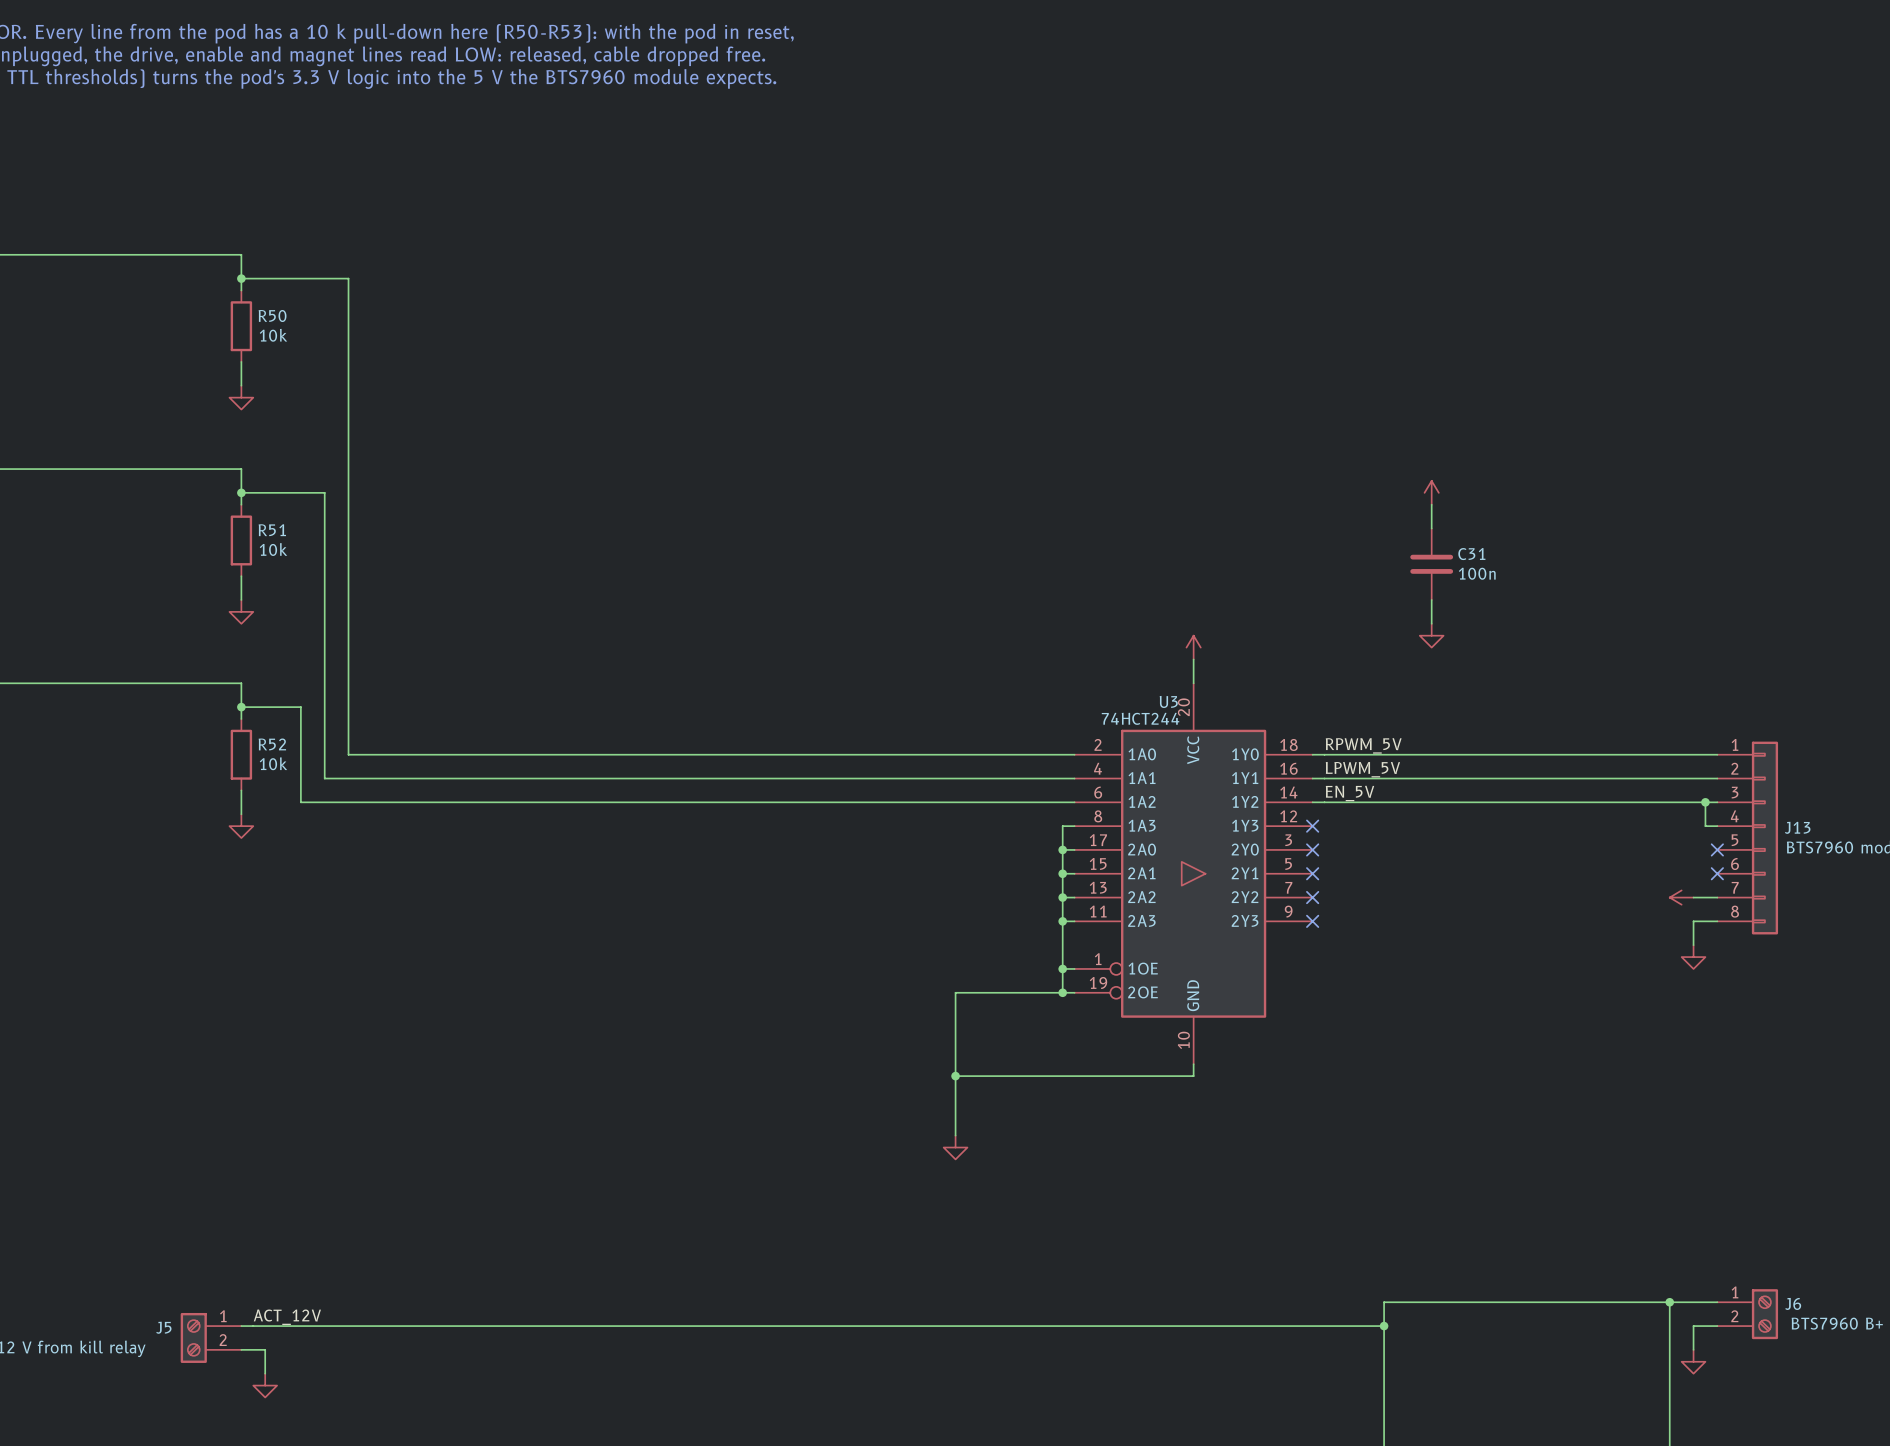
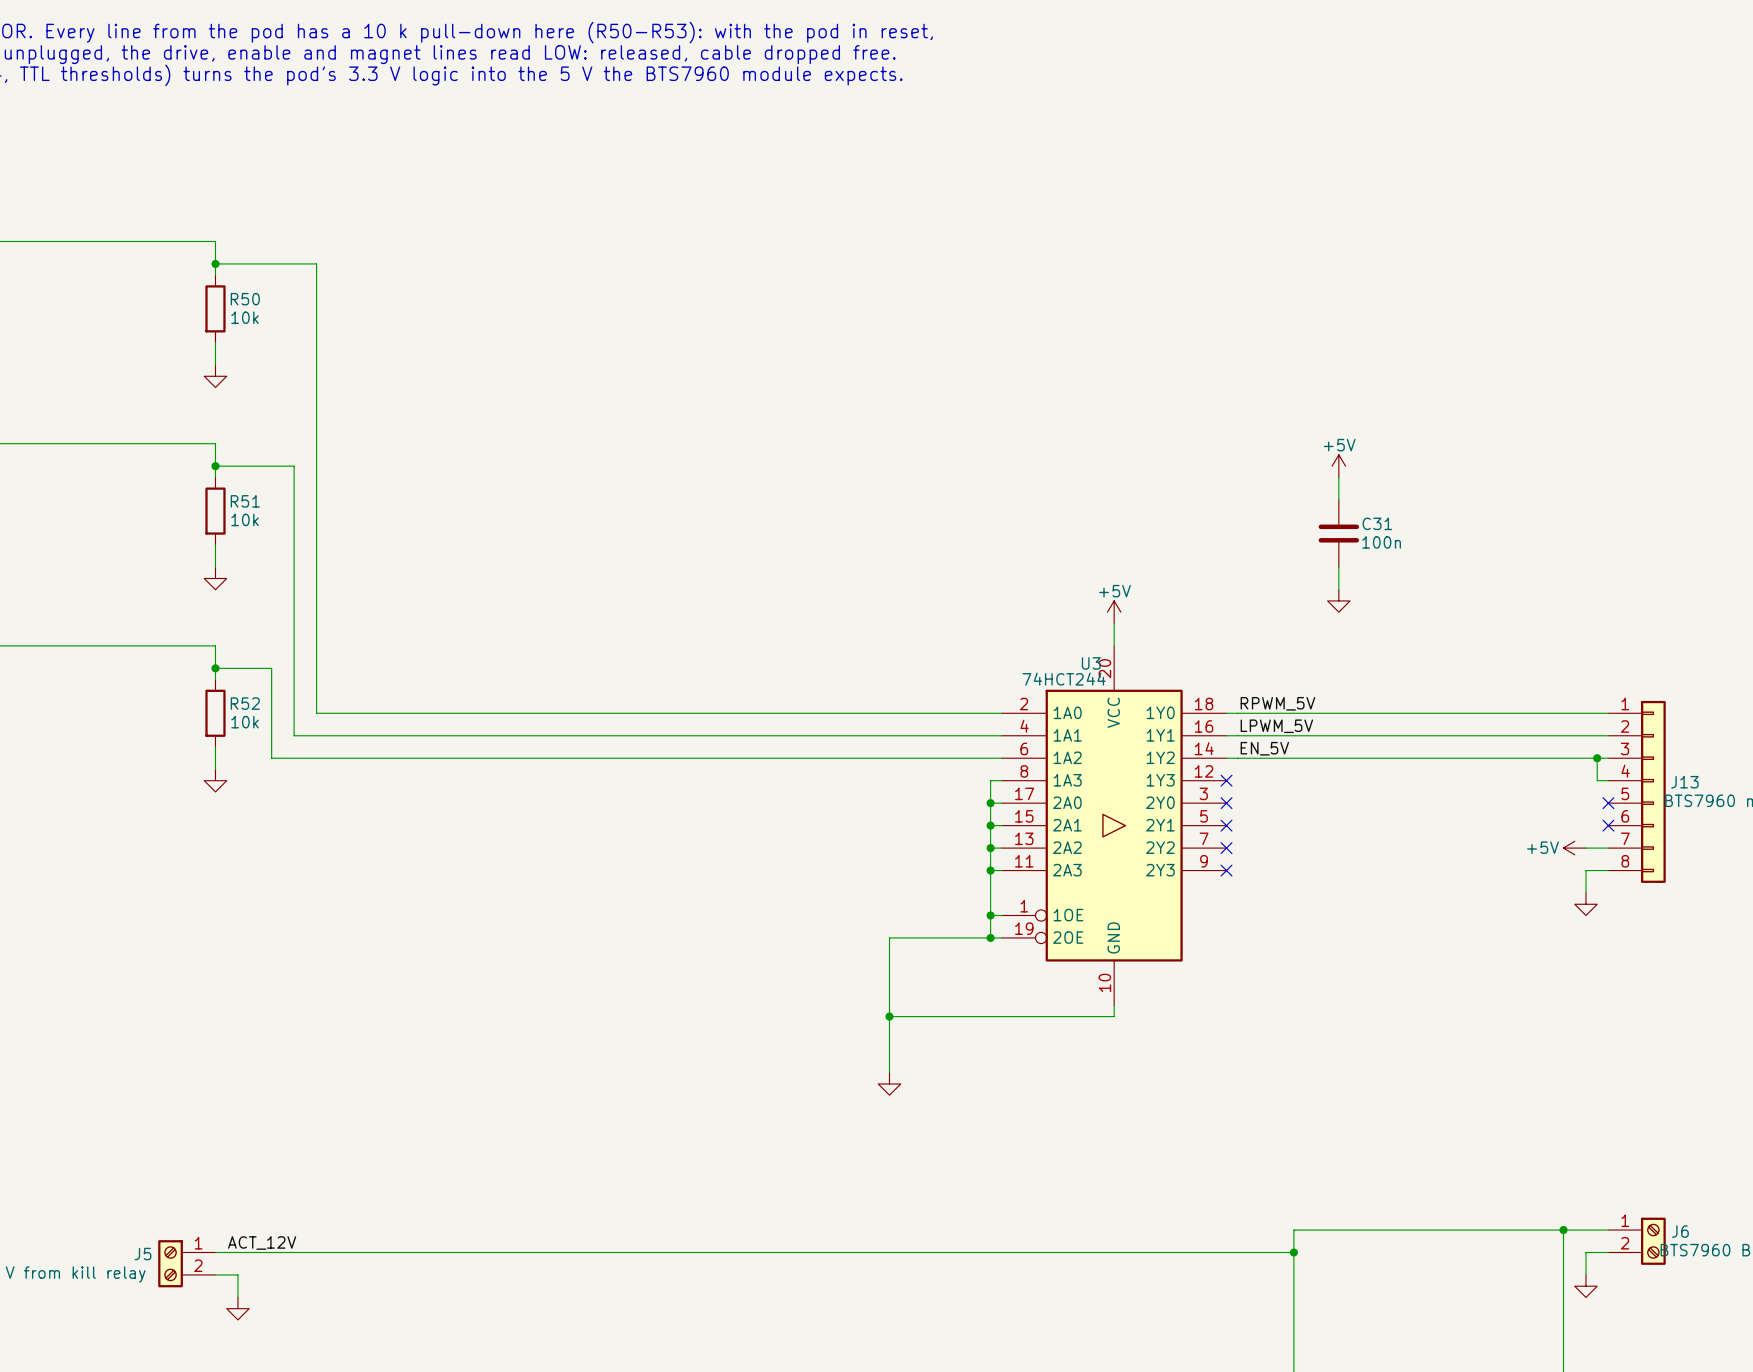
power symbol text: none -> +5V (1339, 445)
power symbol text: none -> +5V (1114, 591)
power symbol text: none -> +5V (1543, 847)

